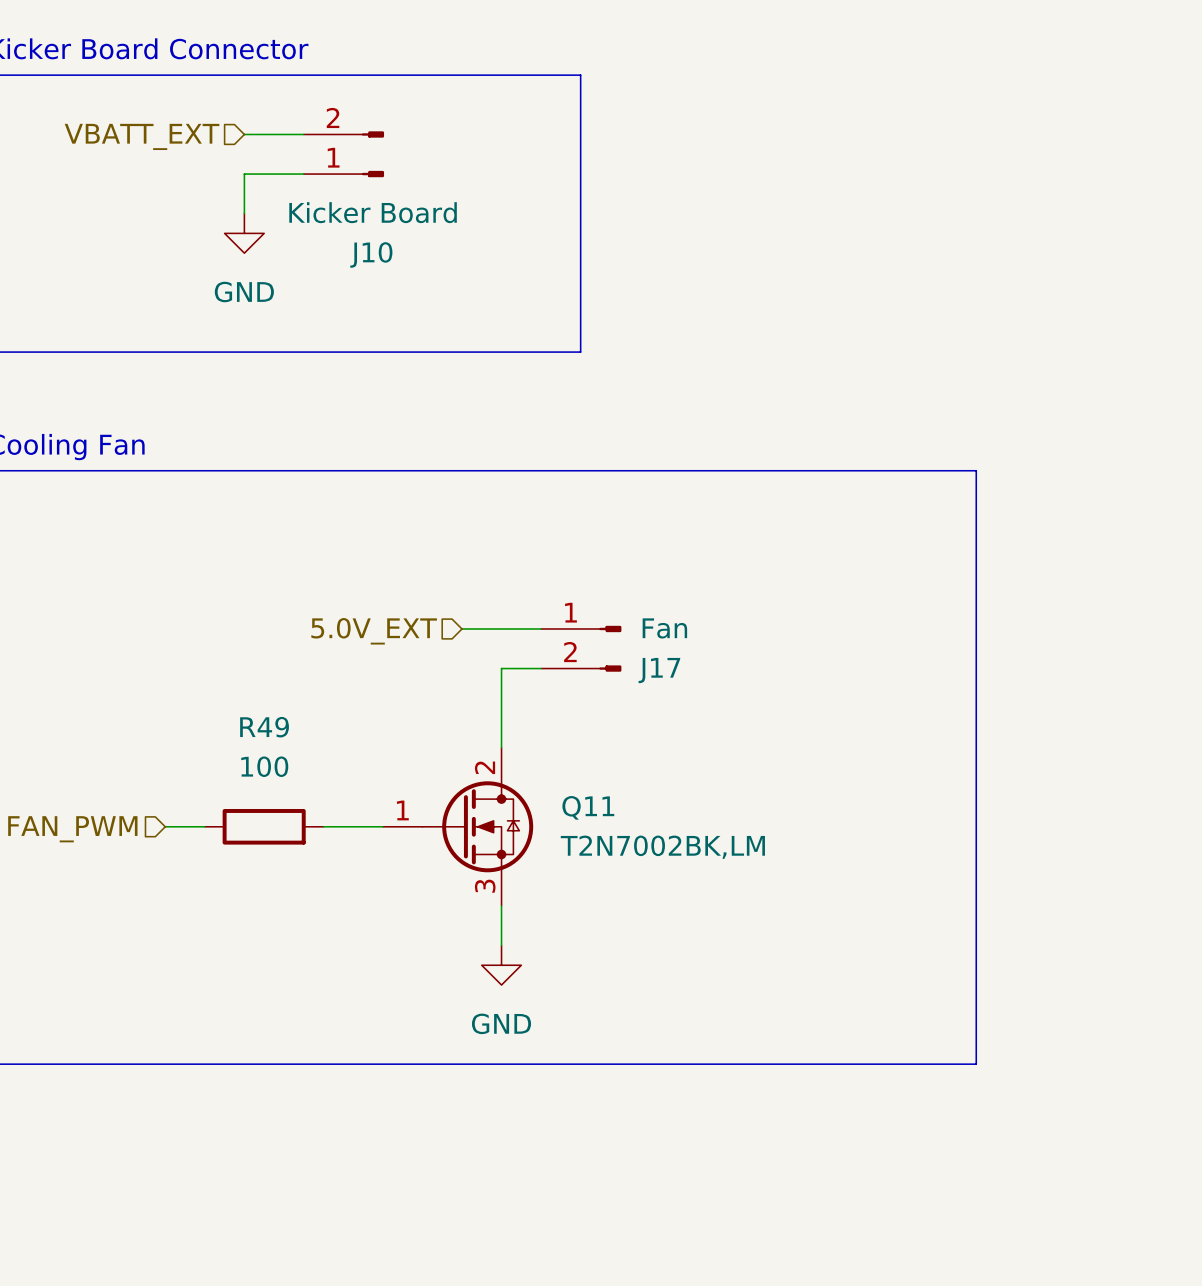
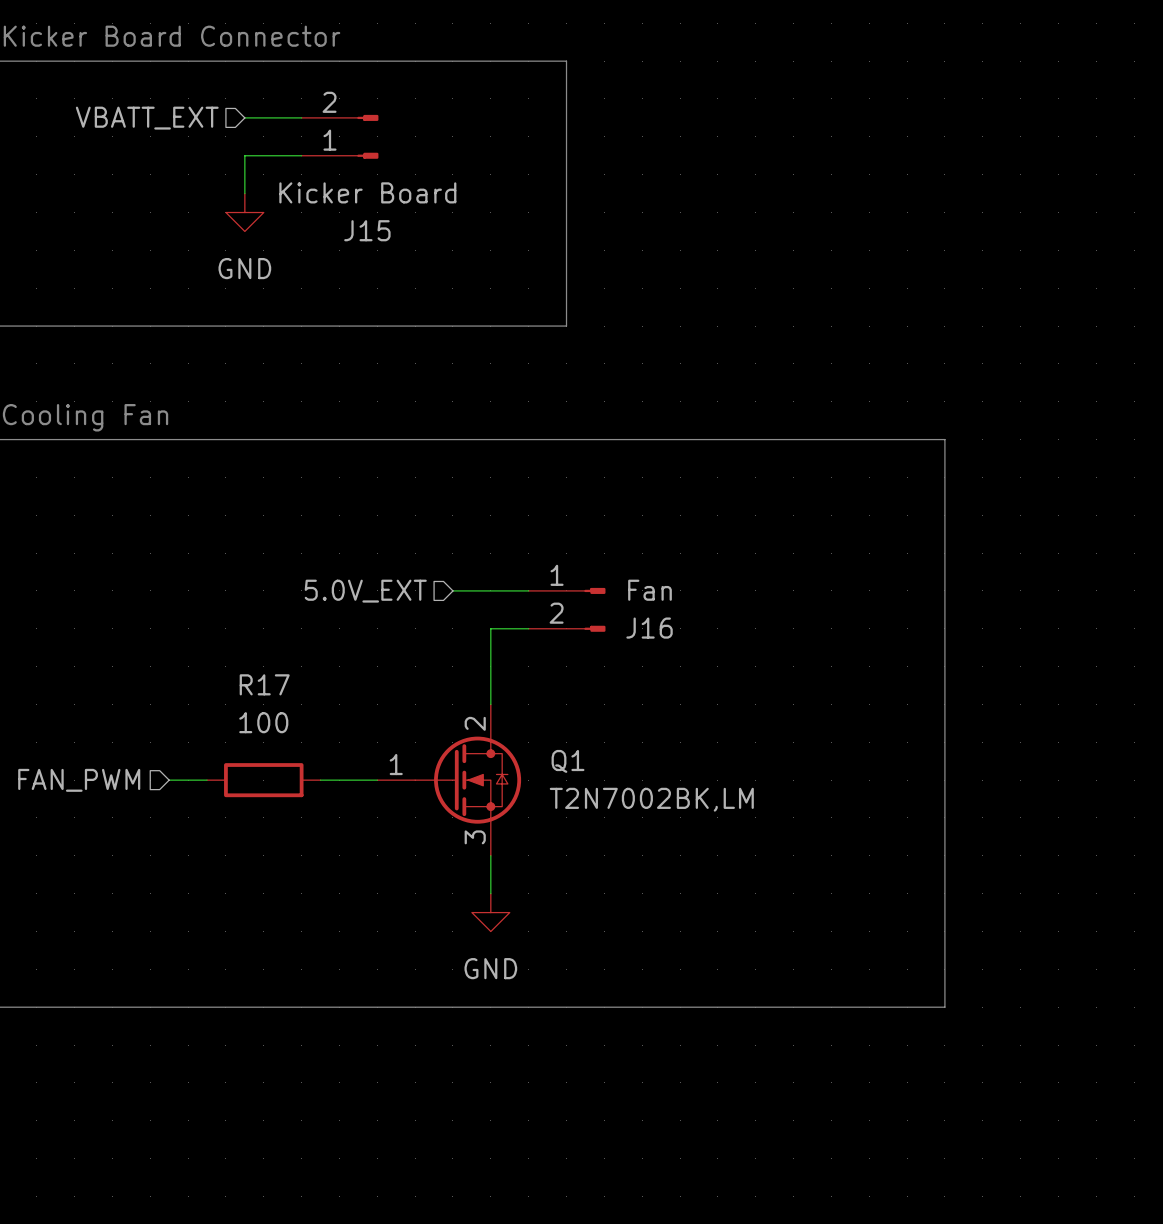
J10 name: J10 (371, 254) -> J15 (367, 230)
J17 name: J17 (659, 670) -> J16 (649, 628)
R49 name: R49 (264, 727) -> R17 (264, 684)
Q11 name: Q11 (588, 807) -> Q1 (568, 761)

